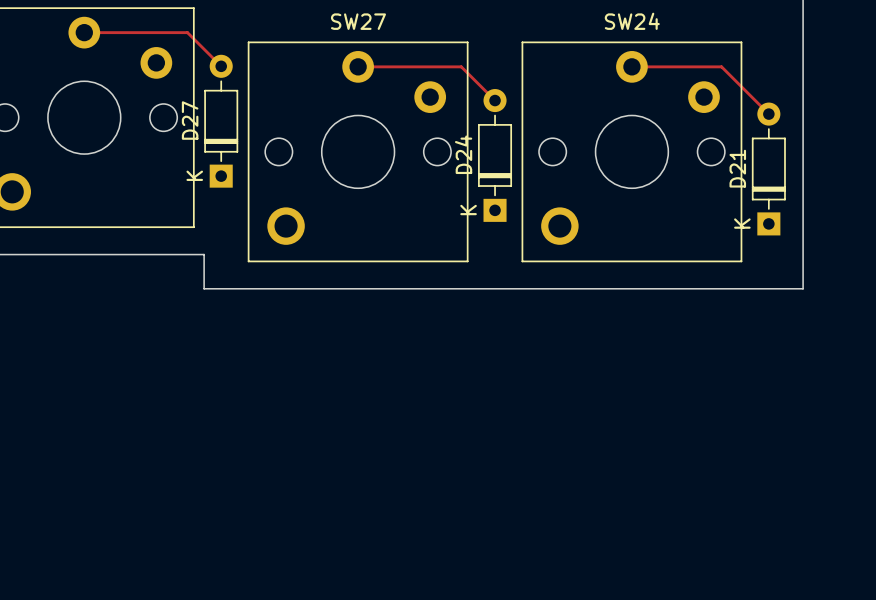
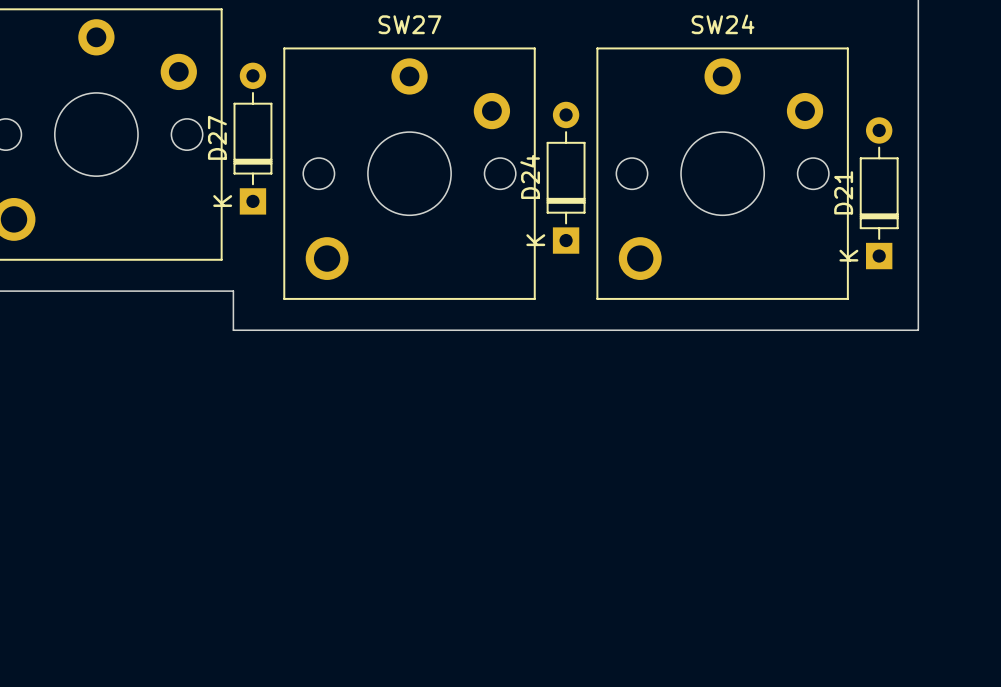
track: (84, 32) (187, 32) (221, 66) -> none
track: (358, 66) (461, 66) (495, 100) -> none
track: (631, 66) (721, 66) (768, 114) -> none

